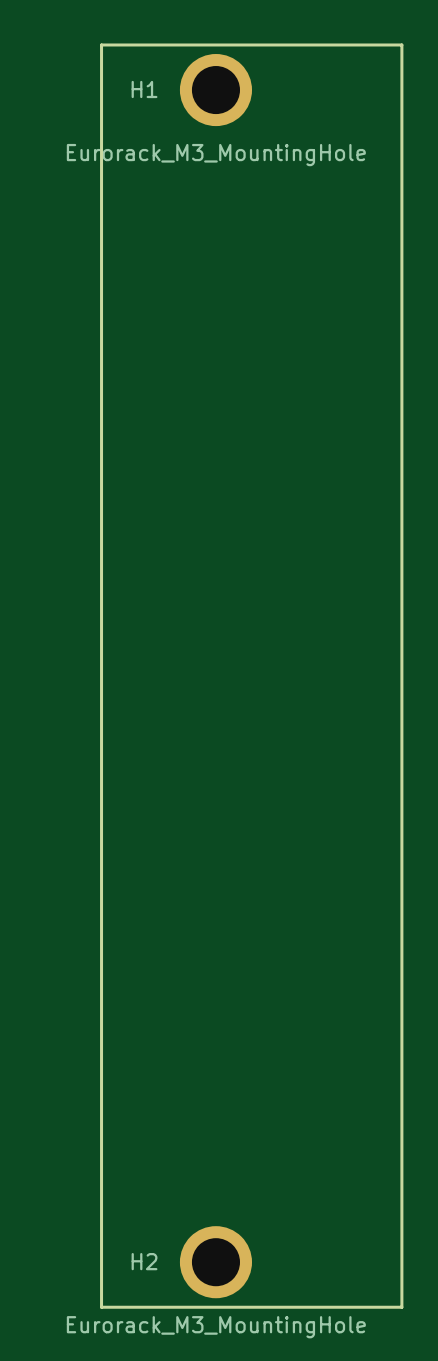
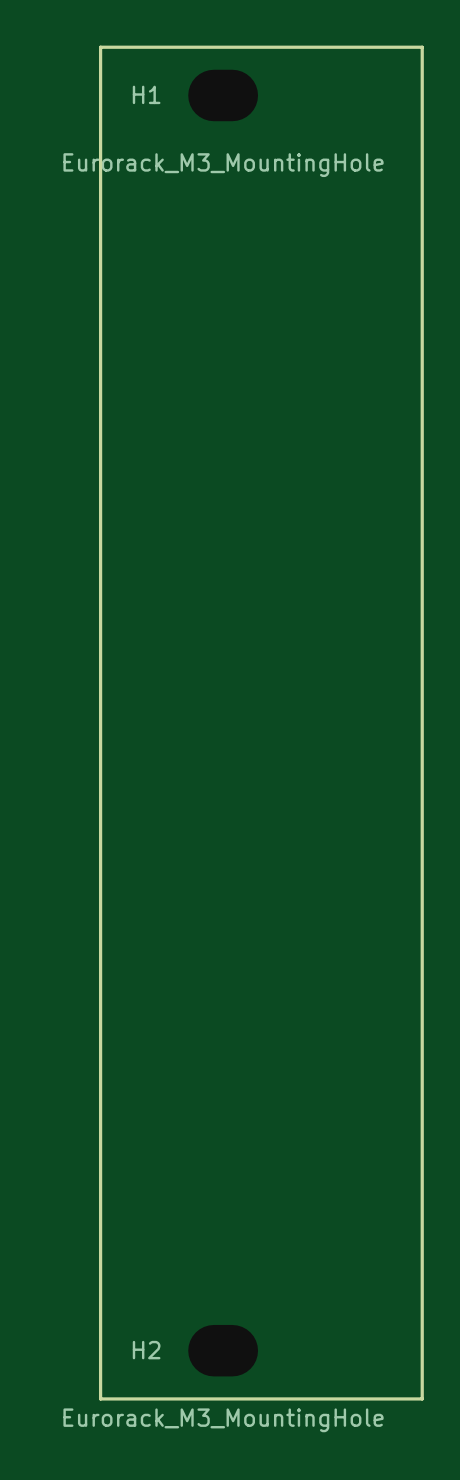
H1 footprint: [179, 54, 253, 127] -> [188, 69, 259, 122]
H2 footprint: [179, 1226, 253, 1299] -> [188, 1324, 259, 1377]

